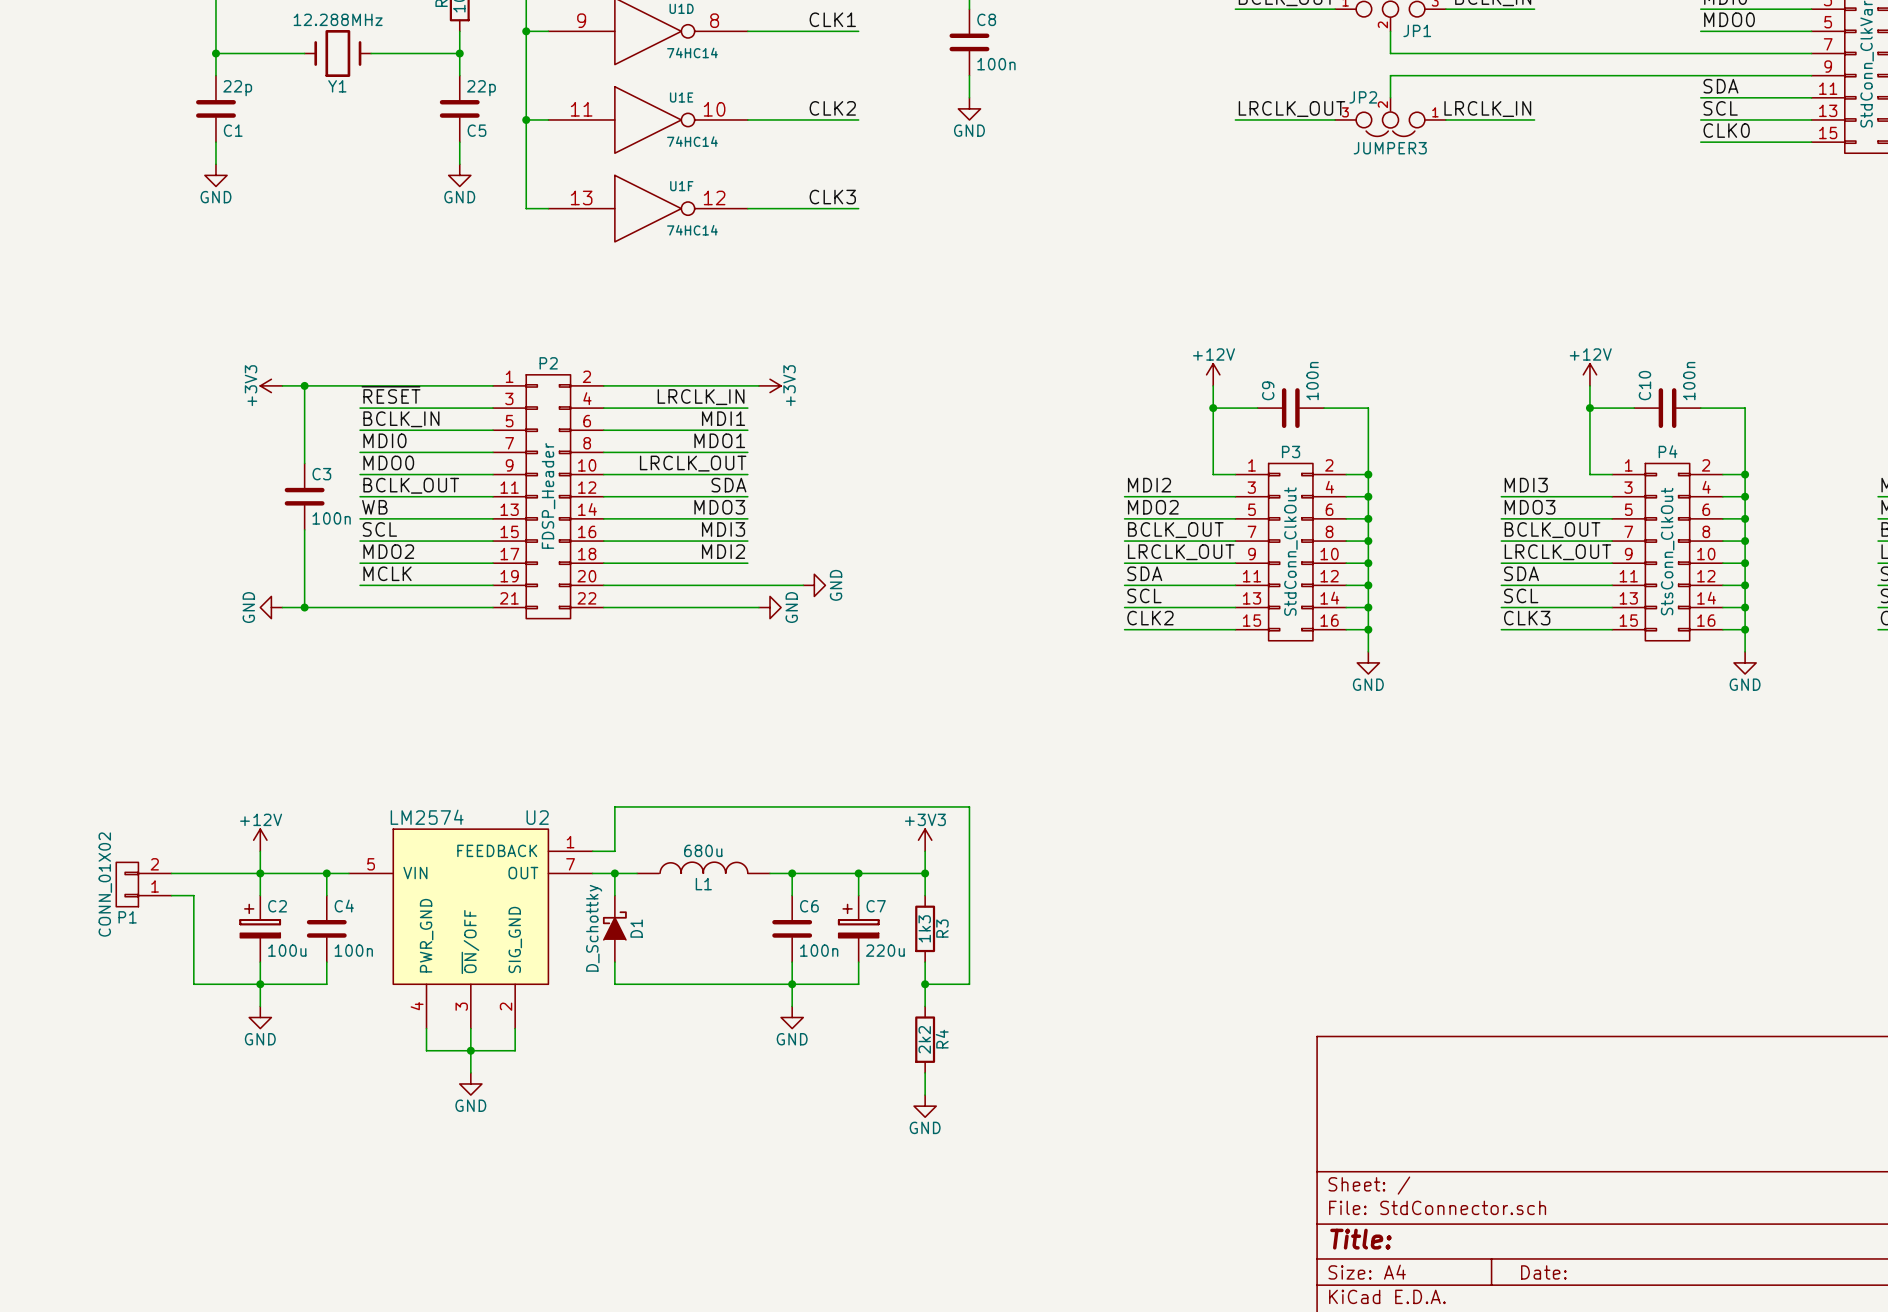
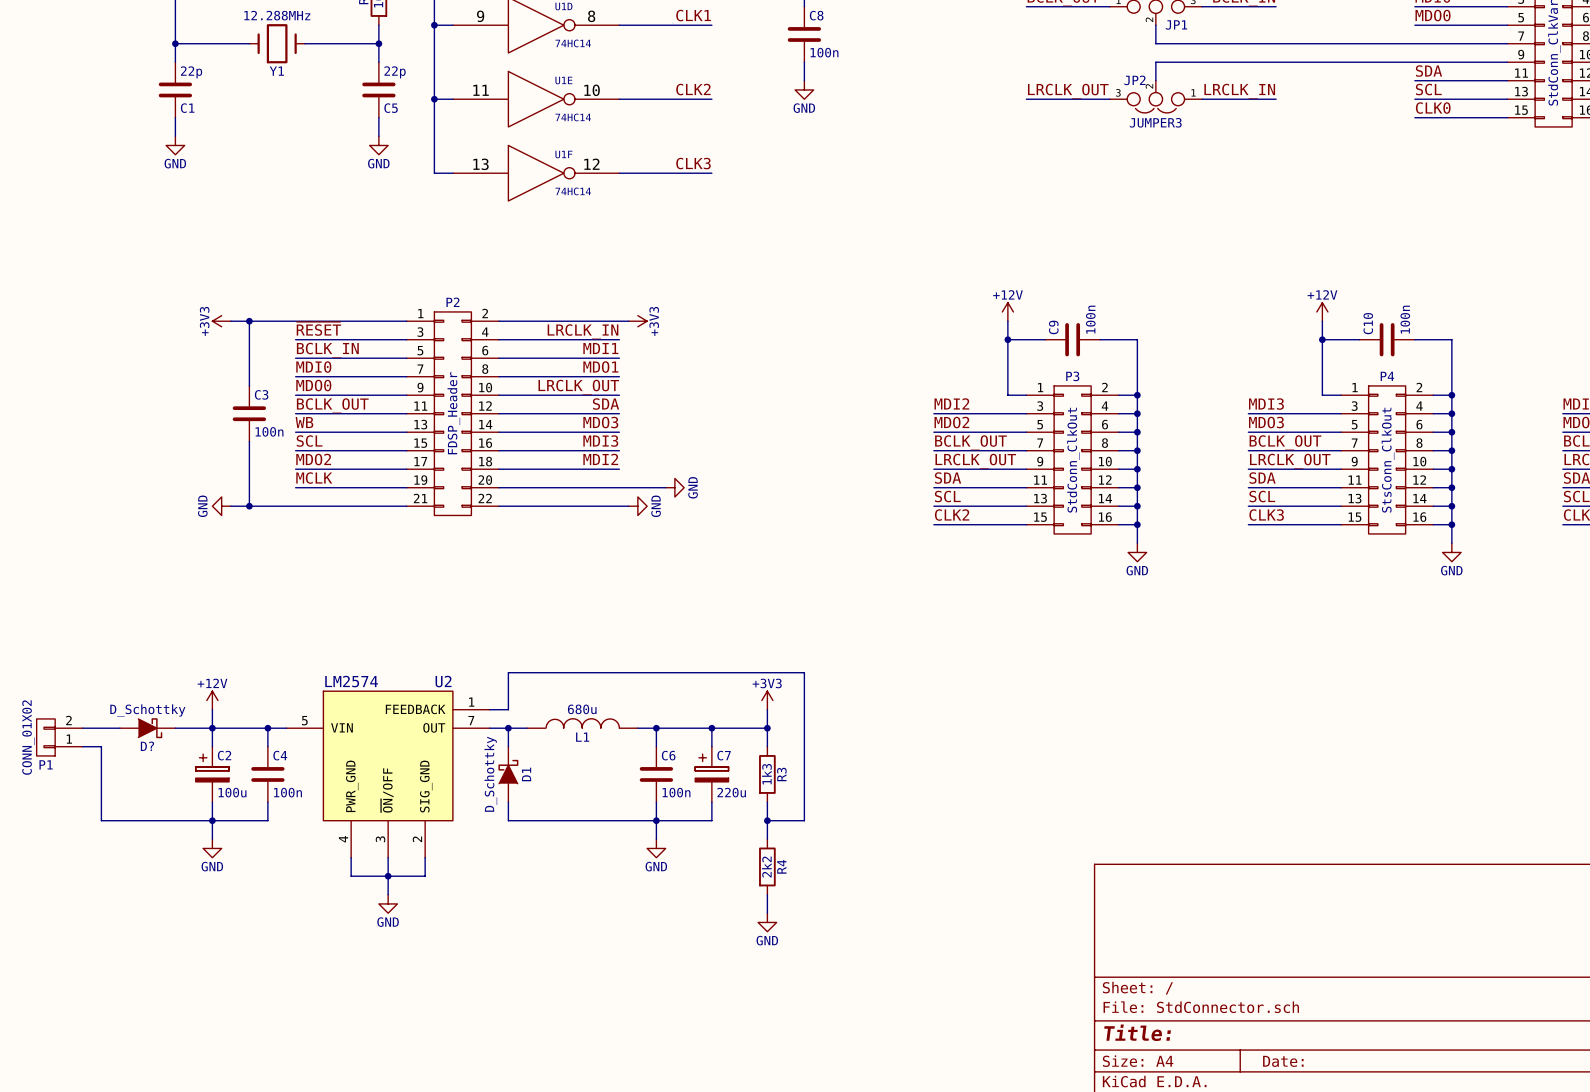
D?: none -> D_Schottky (147, 728)
P1 position: (143, 884) -> (59, 737)
wire: (171, 895) (193, 895) (193, 984) -> (82, 746) (101, 746) (101, 820) (156, 820)

